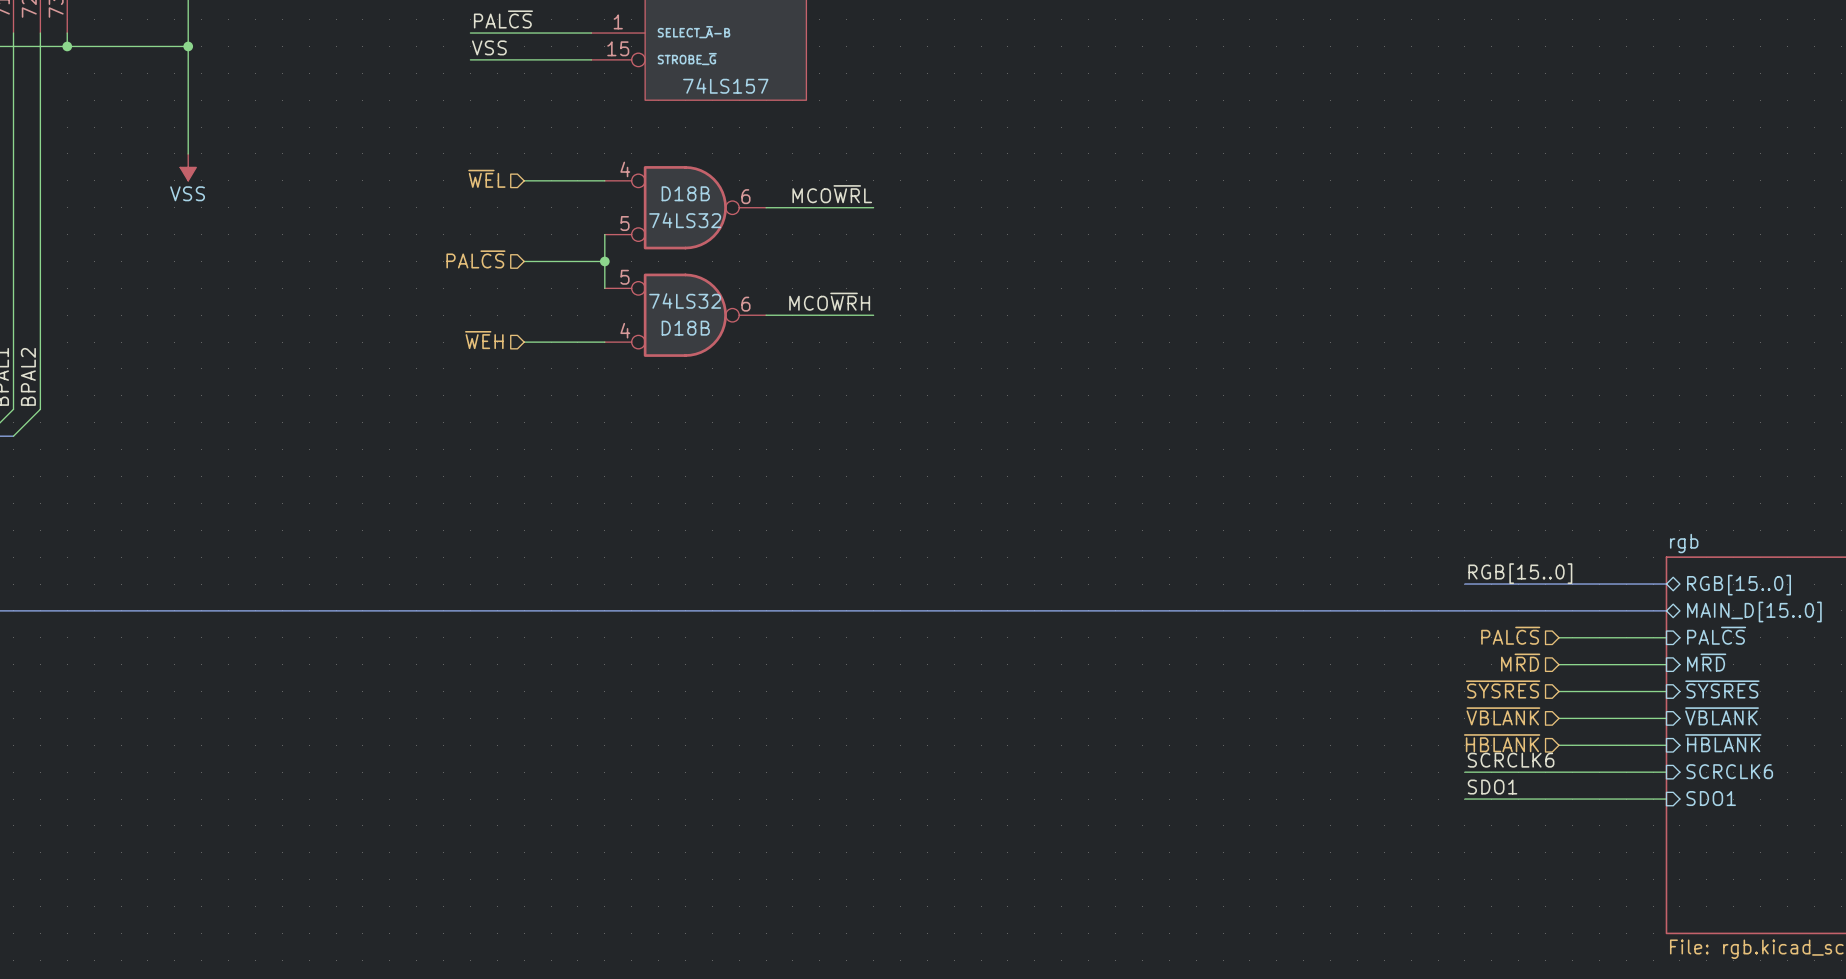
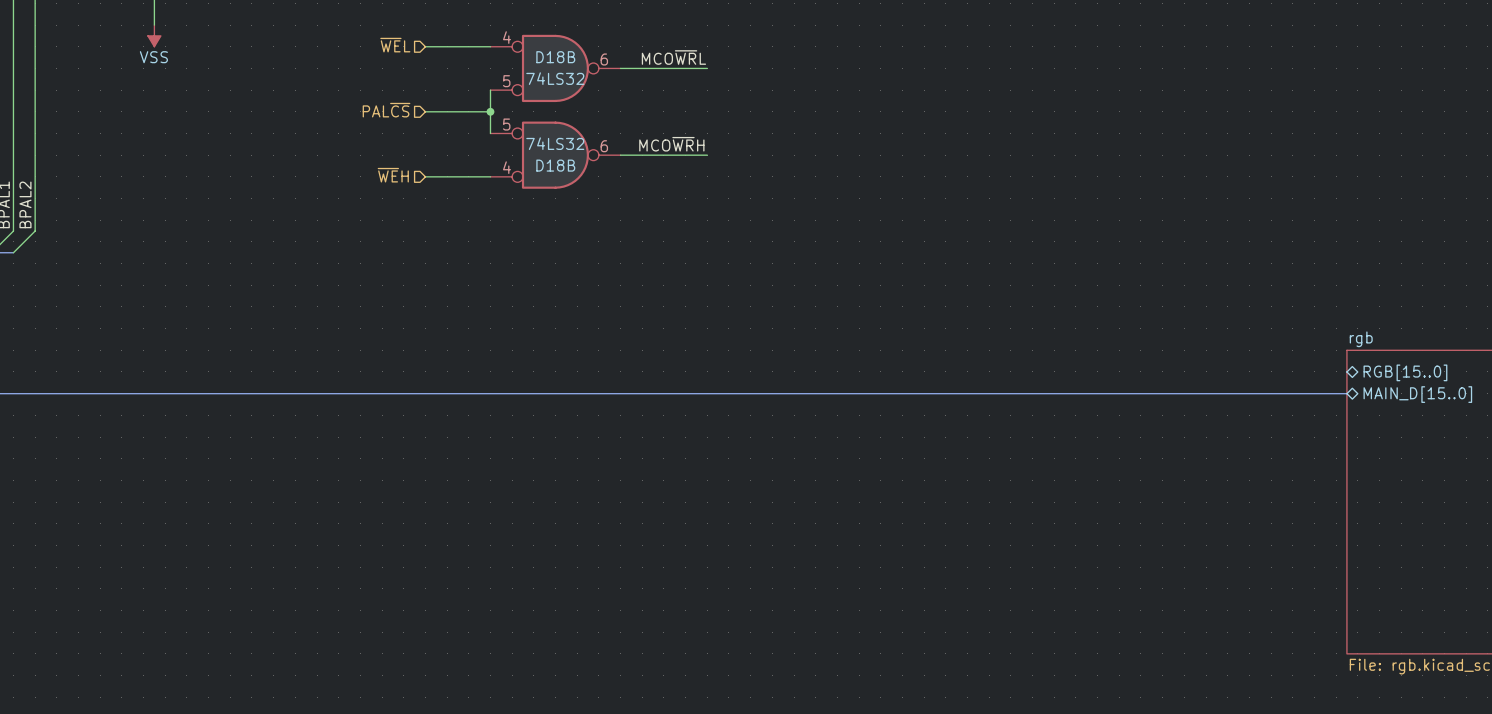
label: RGB[15..0] (1520, 573) -> none
bus: (1464, 584) (1666, 584) -> none
hierarchical label: PAL~{CS} (1510, 635) -> none
sheet pin: PAL~{CS} (1716, 635) -> none
wire: (1558, 637) (1666, 637) -> none
hierarchical label: M~{RD} (1520, 662) -> none
sheet pin: M~{RD} (1706, 662) -> none
wire: (1558, 664) (1666, 664) -> none
hierarchical label: ~{SYSRES} (1503, 689) -> none
sheet pin: ~{SYSRES} (1722, 689) -> none
wire: (1558, 691) (1666, 691) -> none
hierarchical label: ~{VBLANK} (1503, 716) -> none
sheet pin: ~{VBLANK} (1722, 716) -> none
wire: (1558, 718) (1666, 718) -> none
hierarchical label: ~{HBLANK} (1502, 743) -> none
sheet pin: ~{HBLANK} (1723, 743) -> none
wire: (1558, 745) (1666, 745) -> none
label: SCRCLK6 (1511, 760) -> none
sheet pin: SCRCLK6 (1729, 771) -> none
wire: (1464, 772) (1666, 772) -> none
label: SDO1 (1492, 787) -> none
sheet pin: SDO1 (1711, 798) -> none
wire: (1464, 799) (1666, 799) -> none

